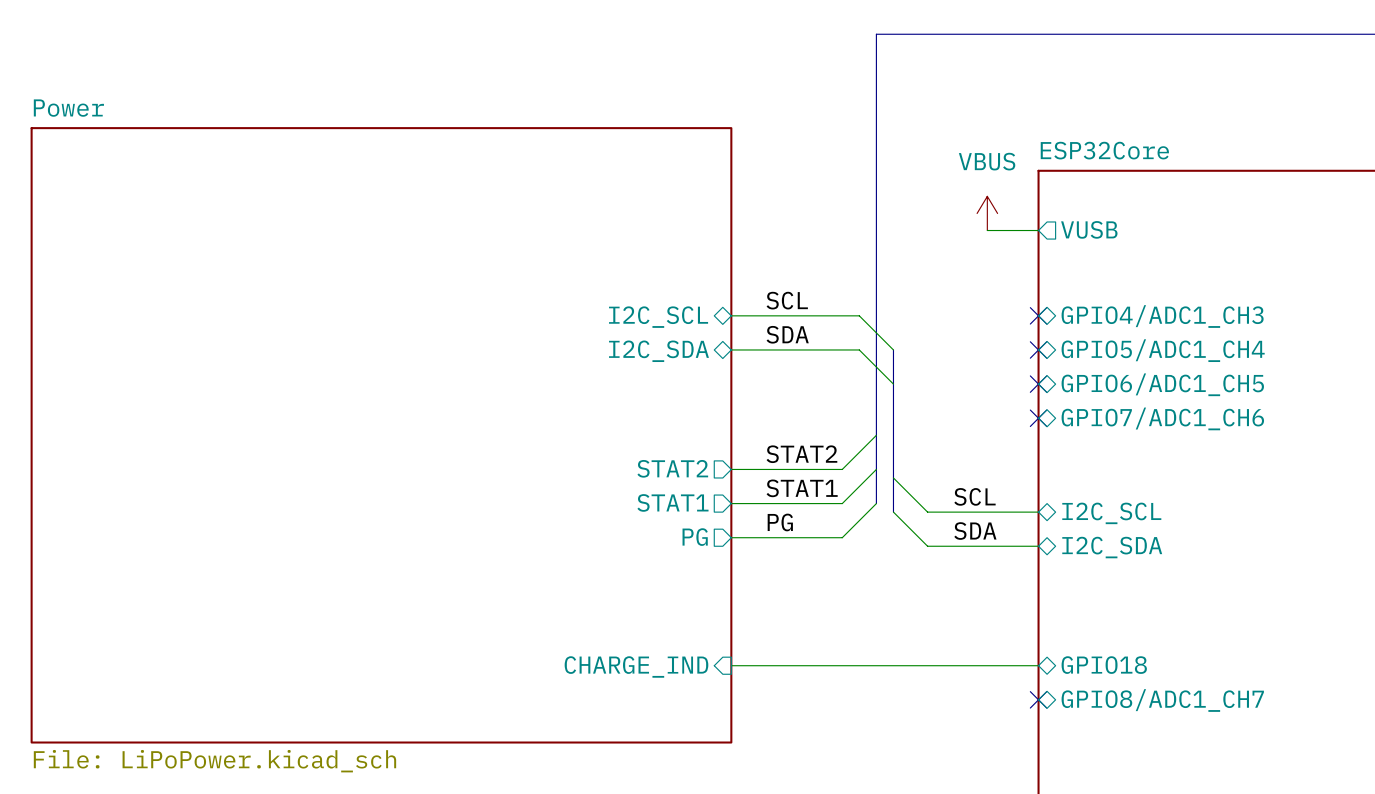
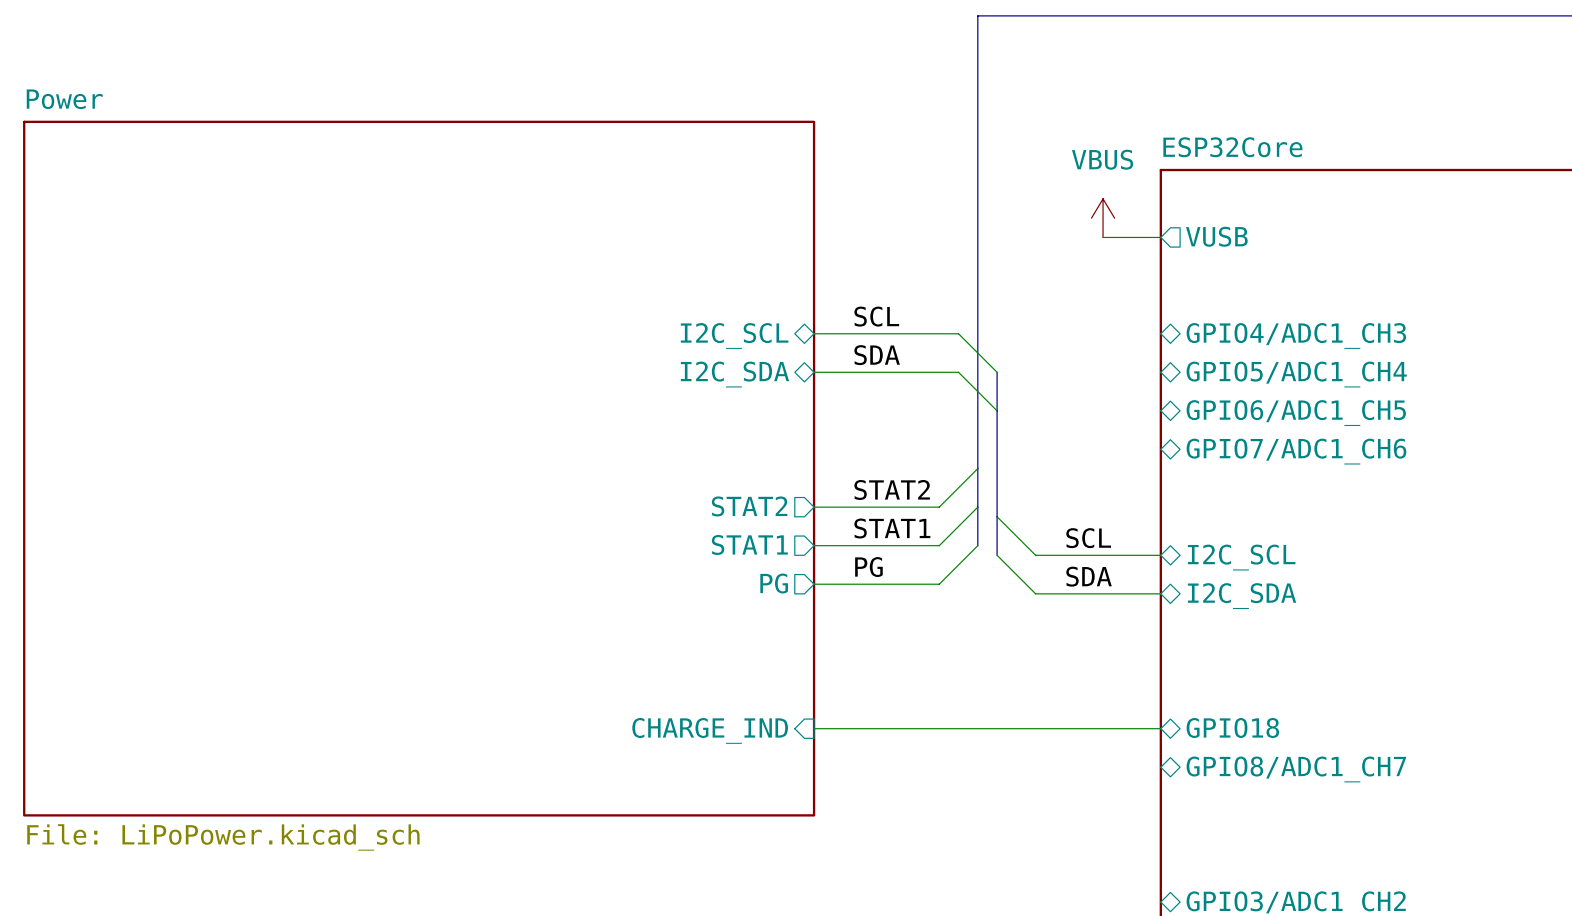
no-connect mark: (1038, 315) -> none
no-connect mark: (1038, 349) -> none
no-connect mark: (1038, 384) -> none
no-connect mark: (1038, 418) -> none
no-connect mark: (1038, 699) -> none

